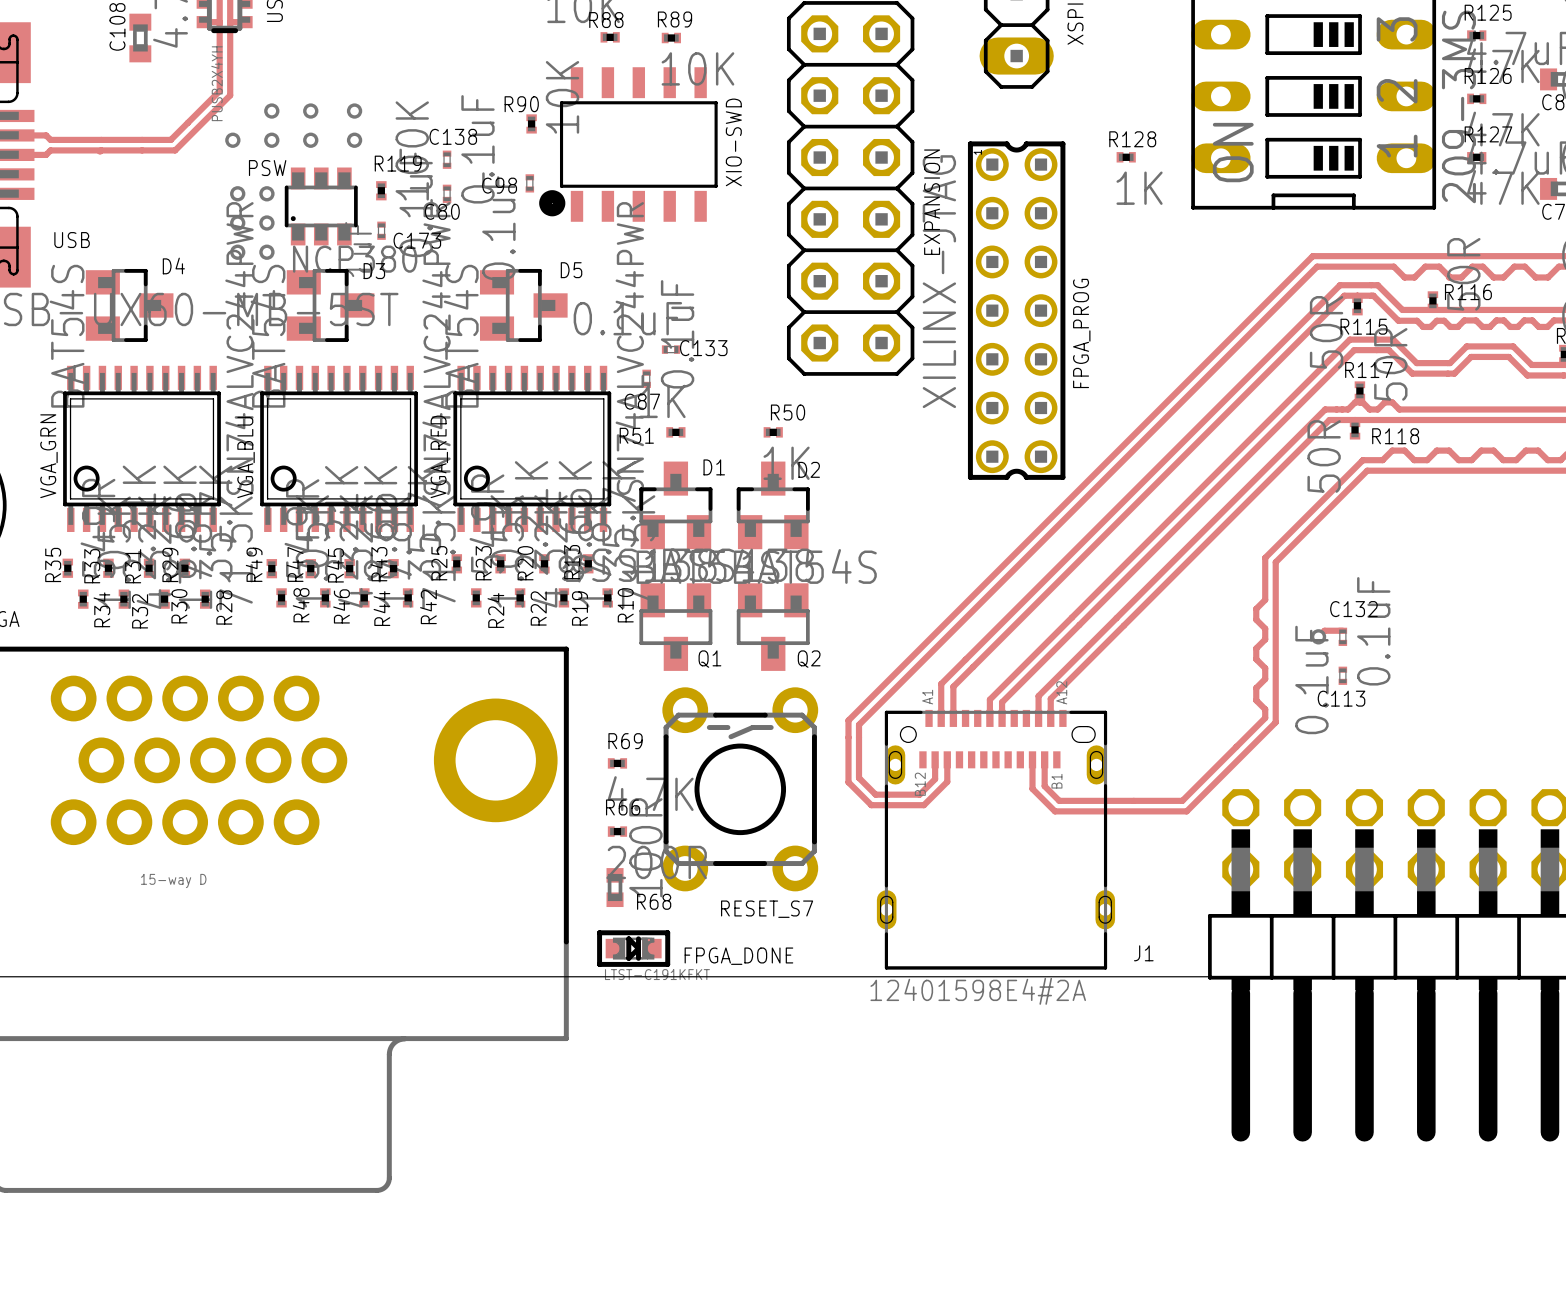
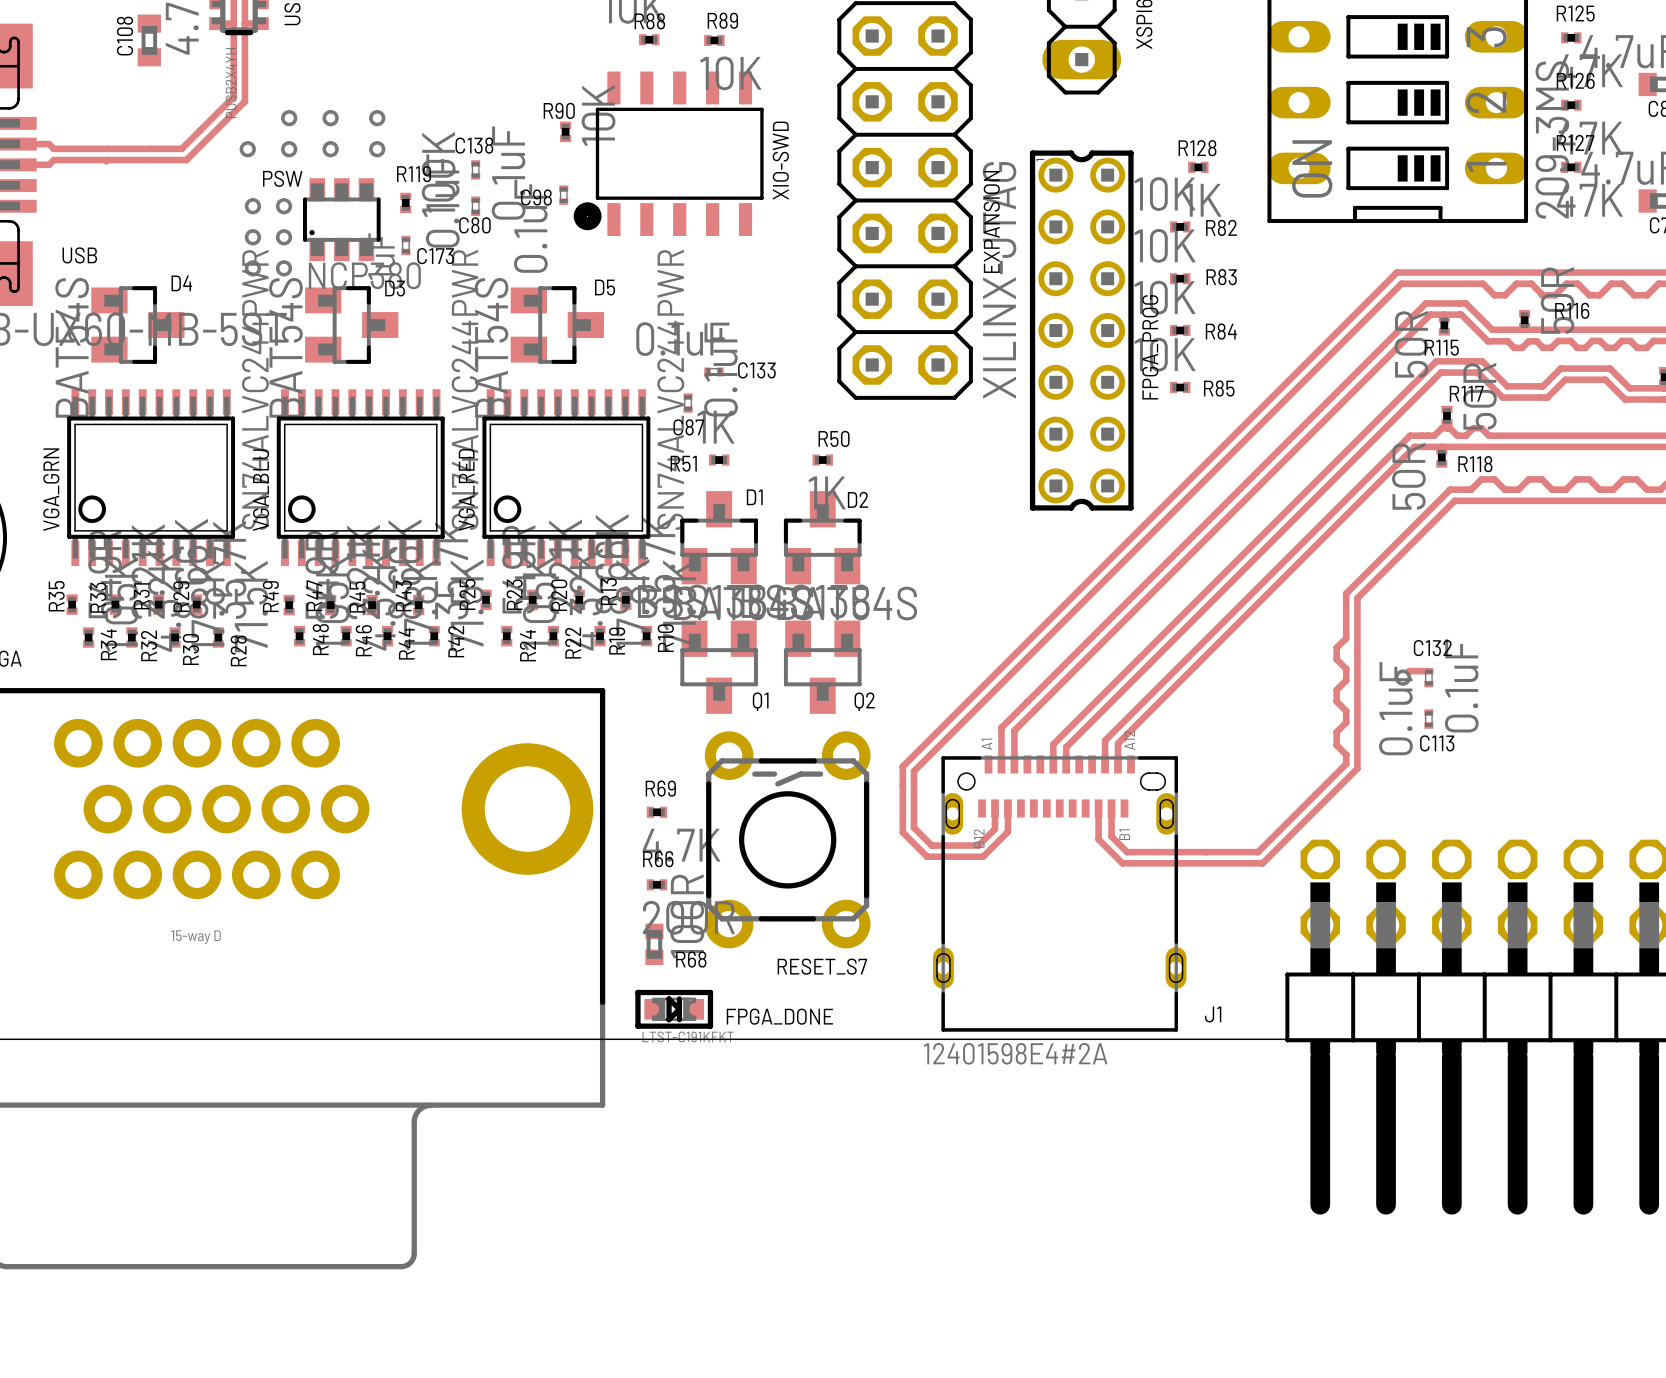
R82: none -> 10K (1180, 226)
R83: none -> 10K (1180, 278)
R84: none -> 10K (1180, 330)
R85: none -> 10K (1180, 387)

